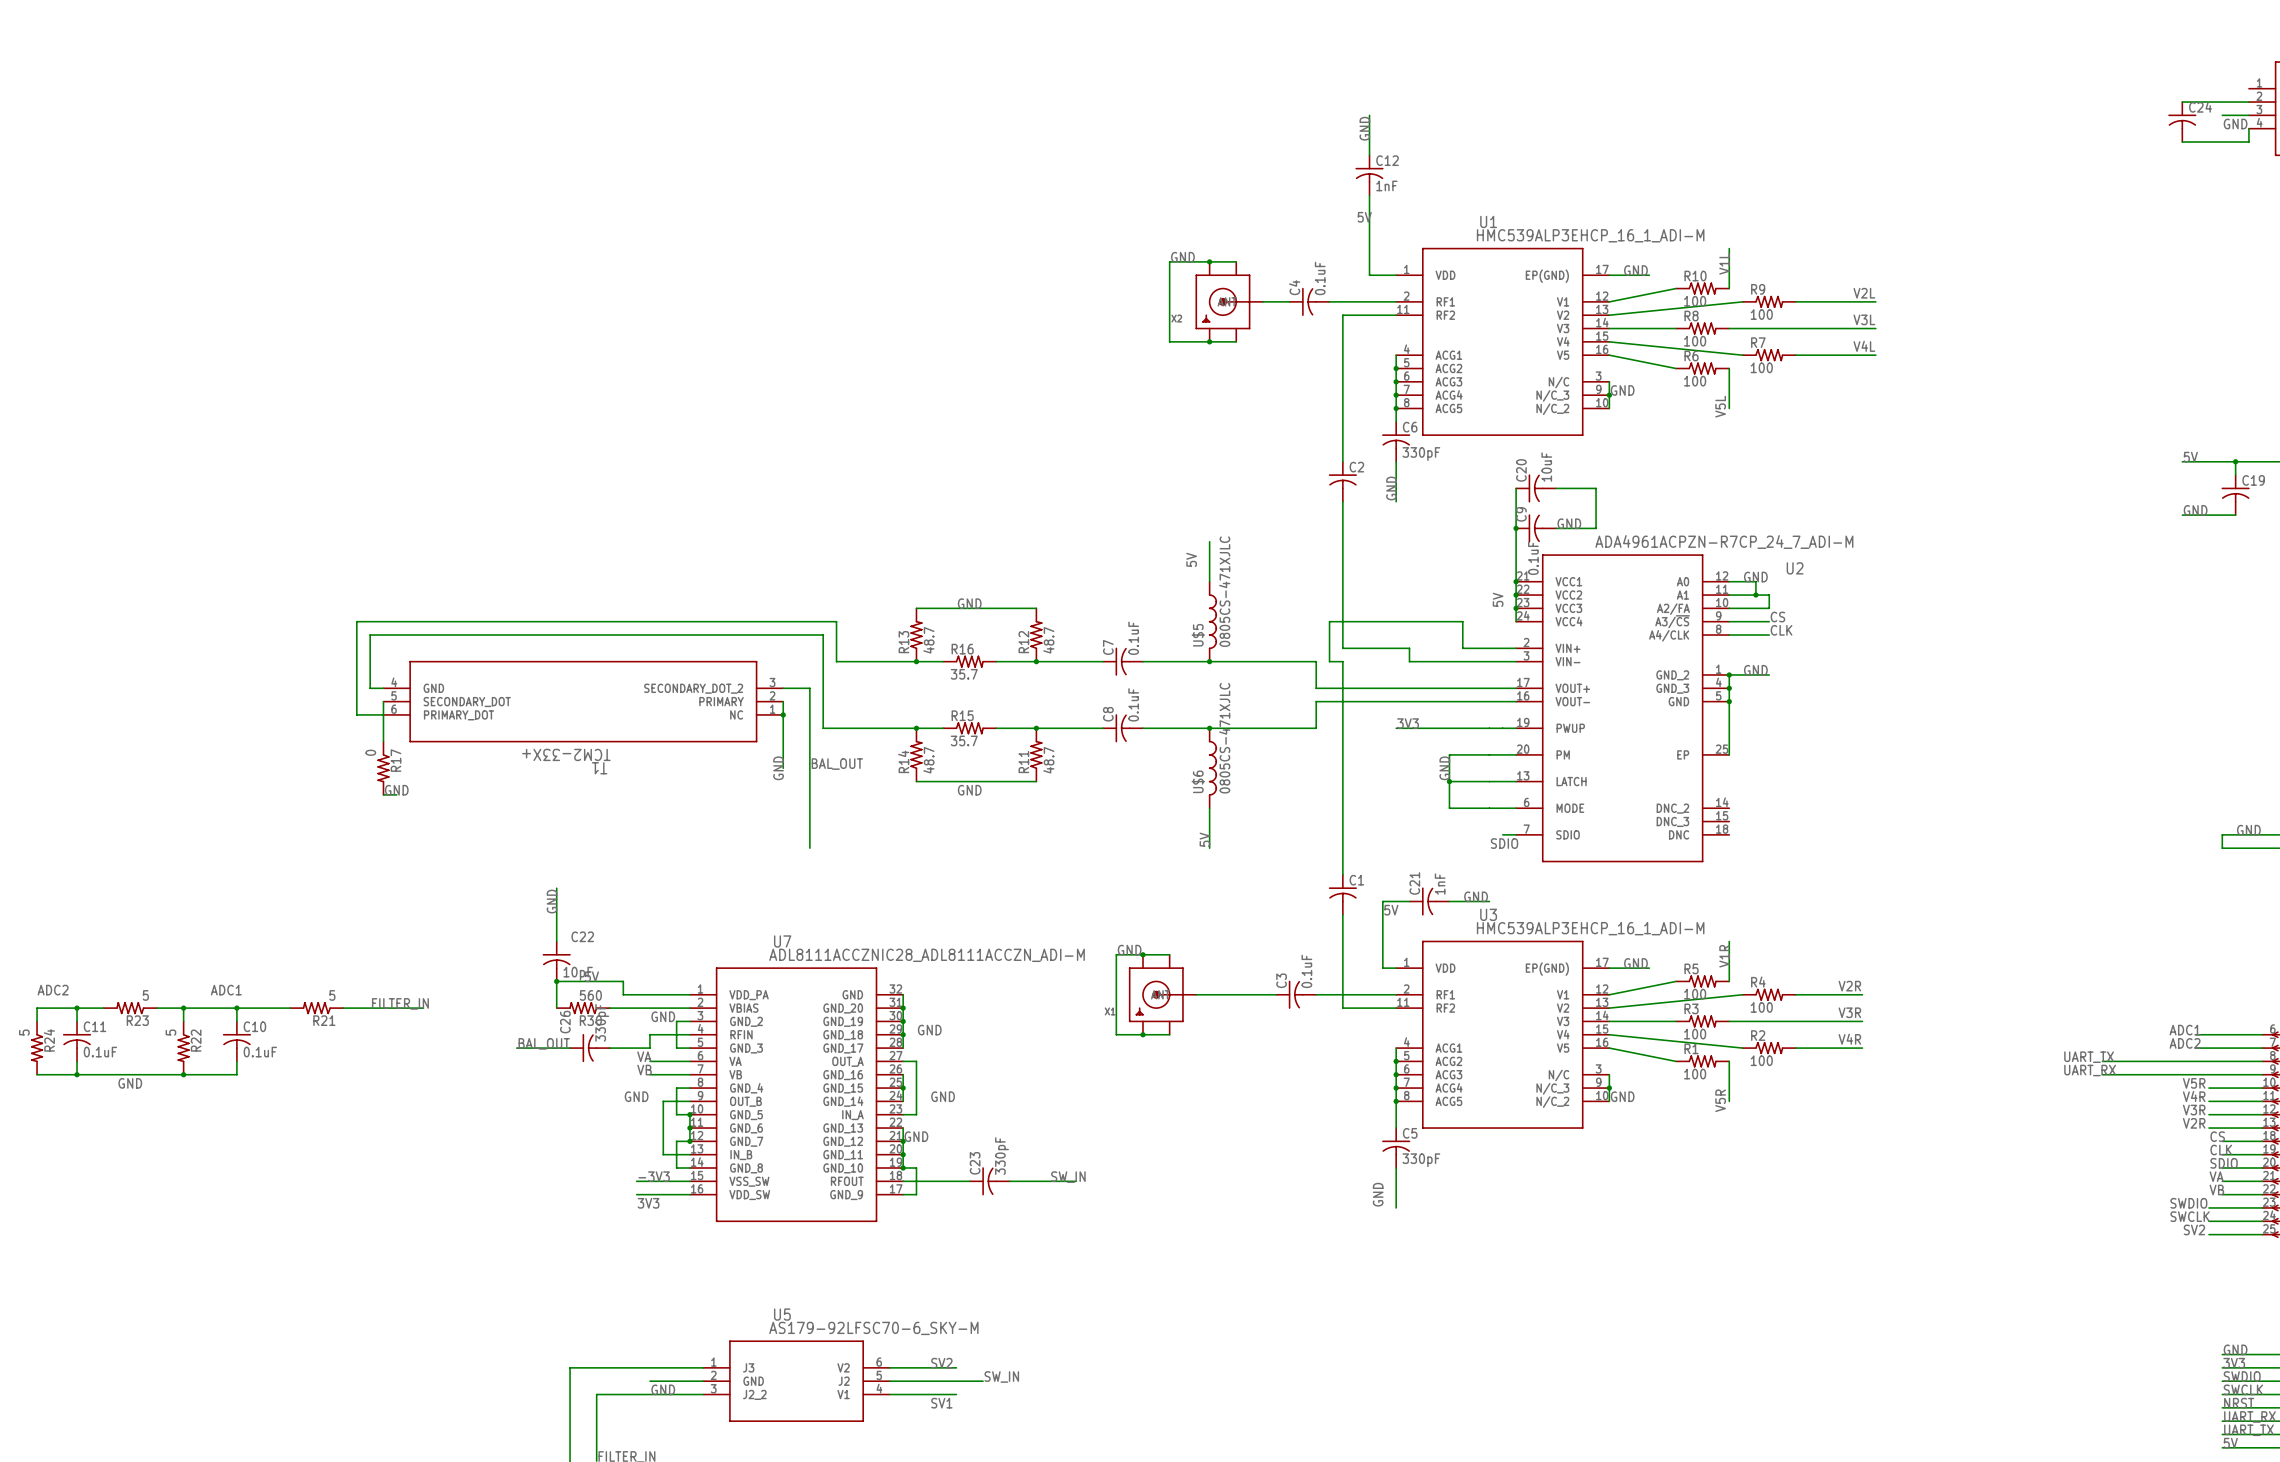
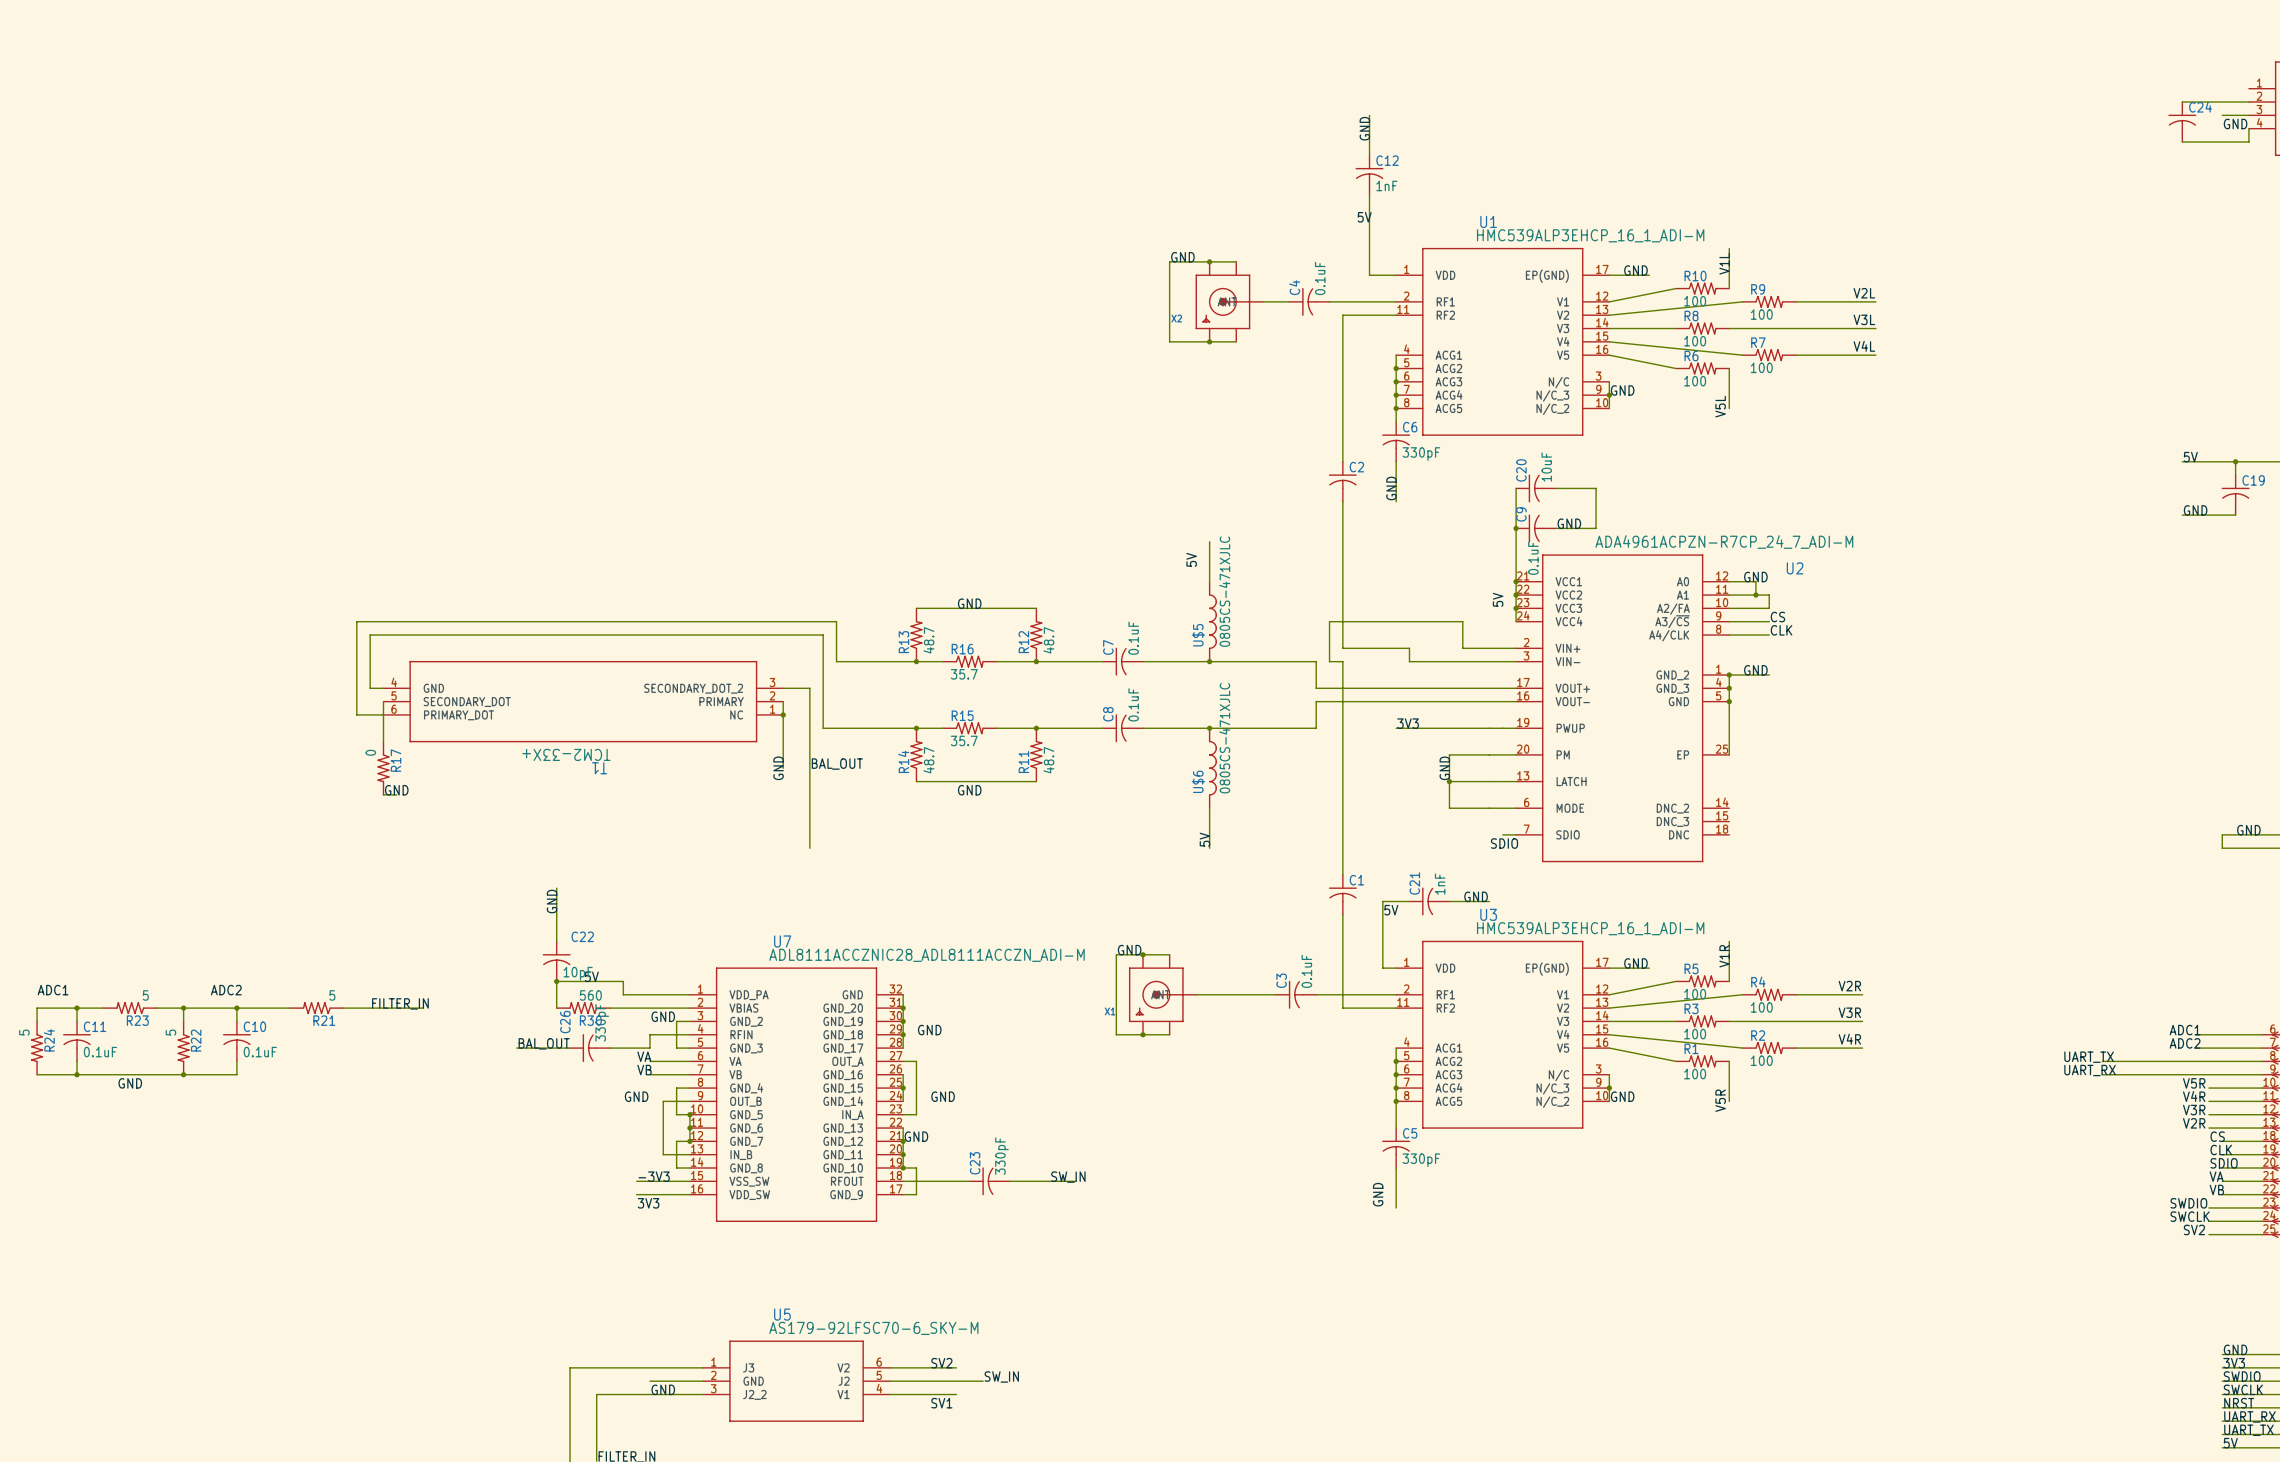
label: ADC2 (53, 990) -> ADC1 (53, 990)
label: ADC1 (226, 990) -> ADC2 (226, 990)

